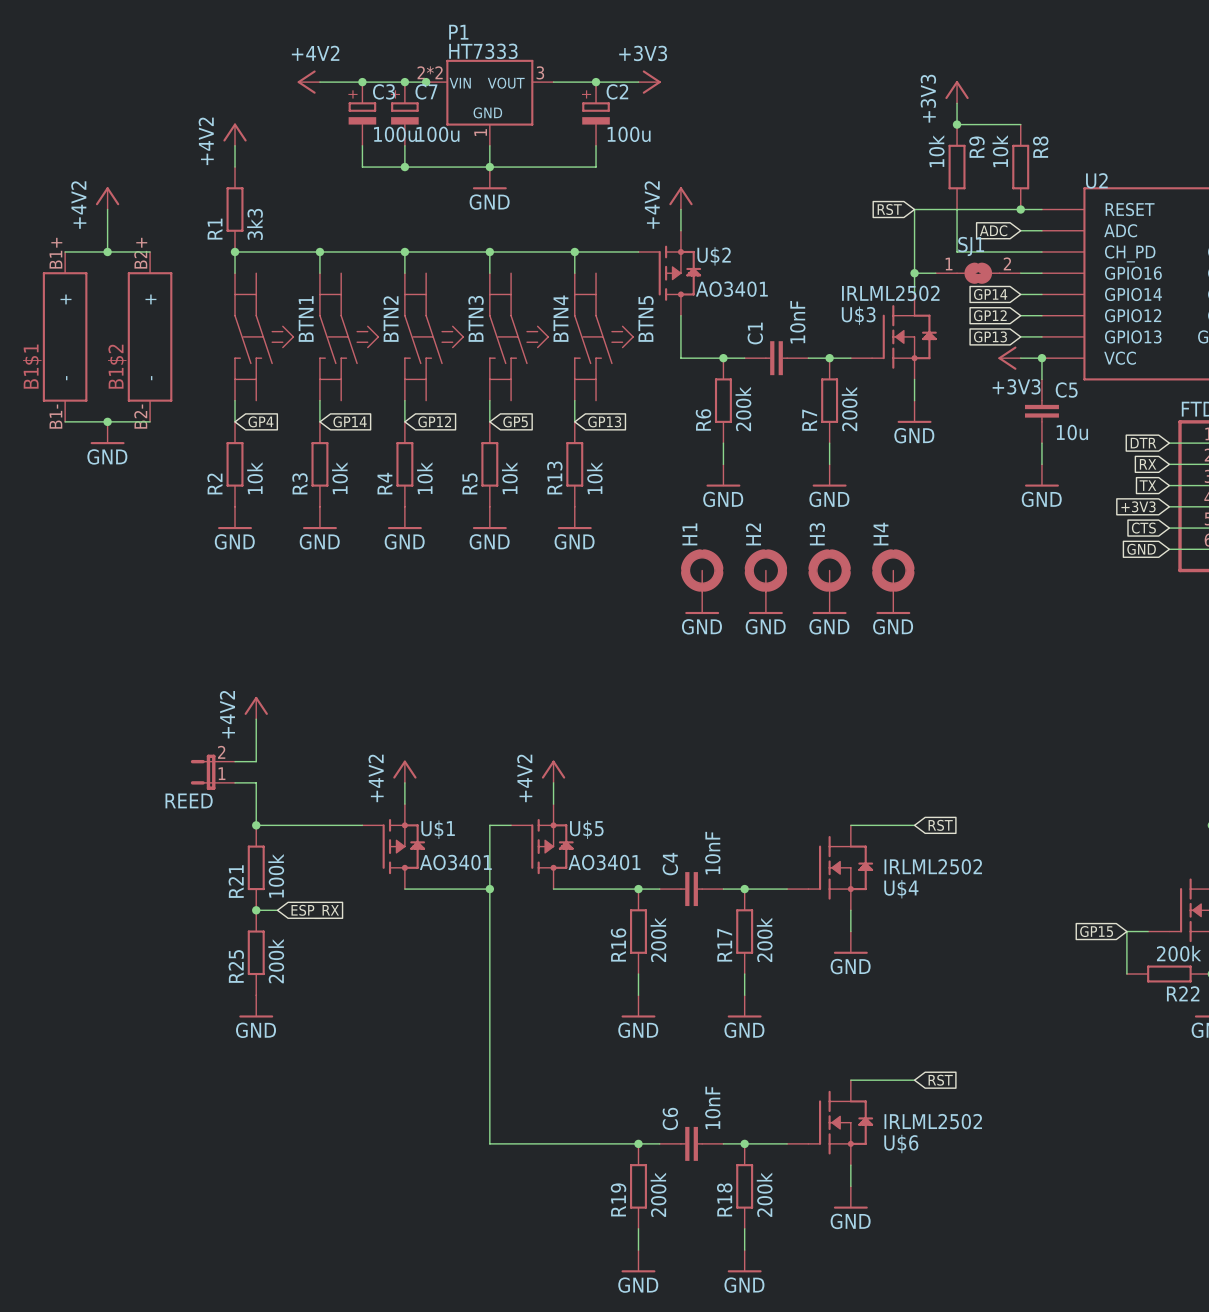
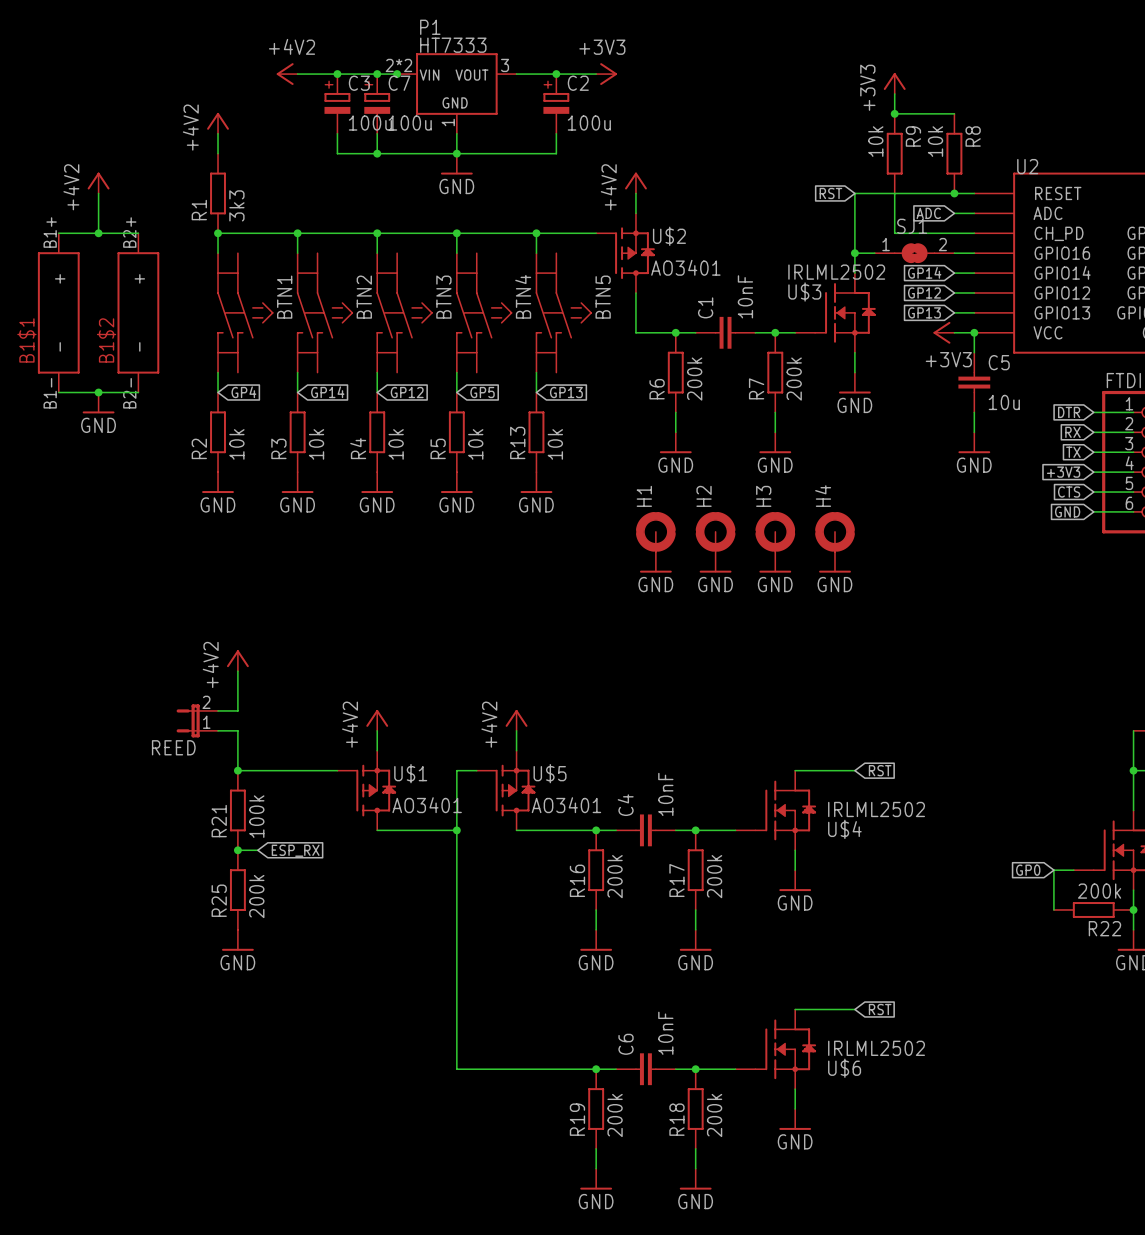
global label: GP15 (1096, 931) -> GP0 (1028, 870)

